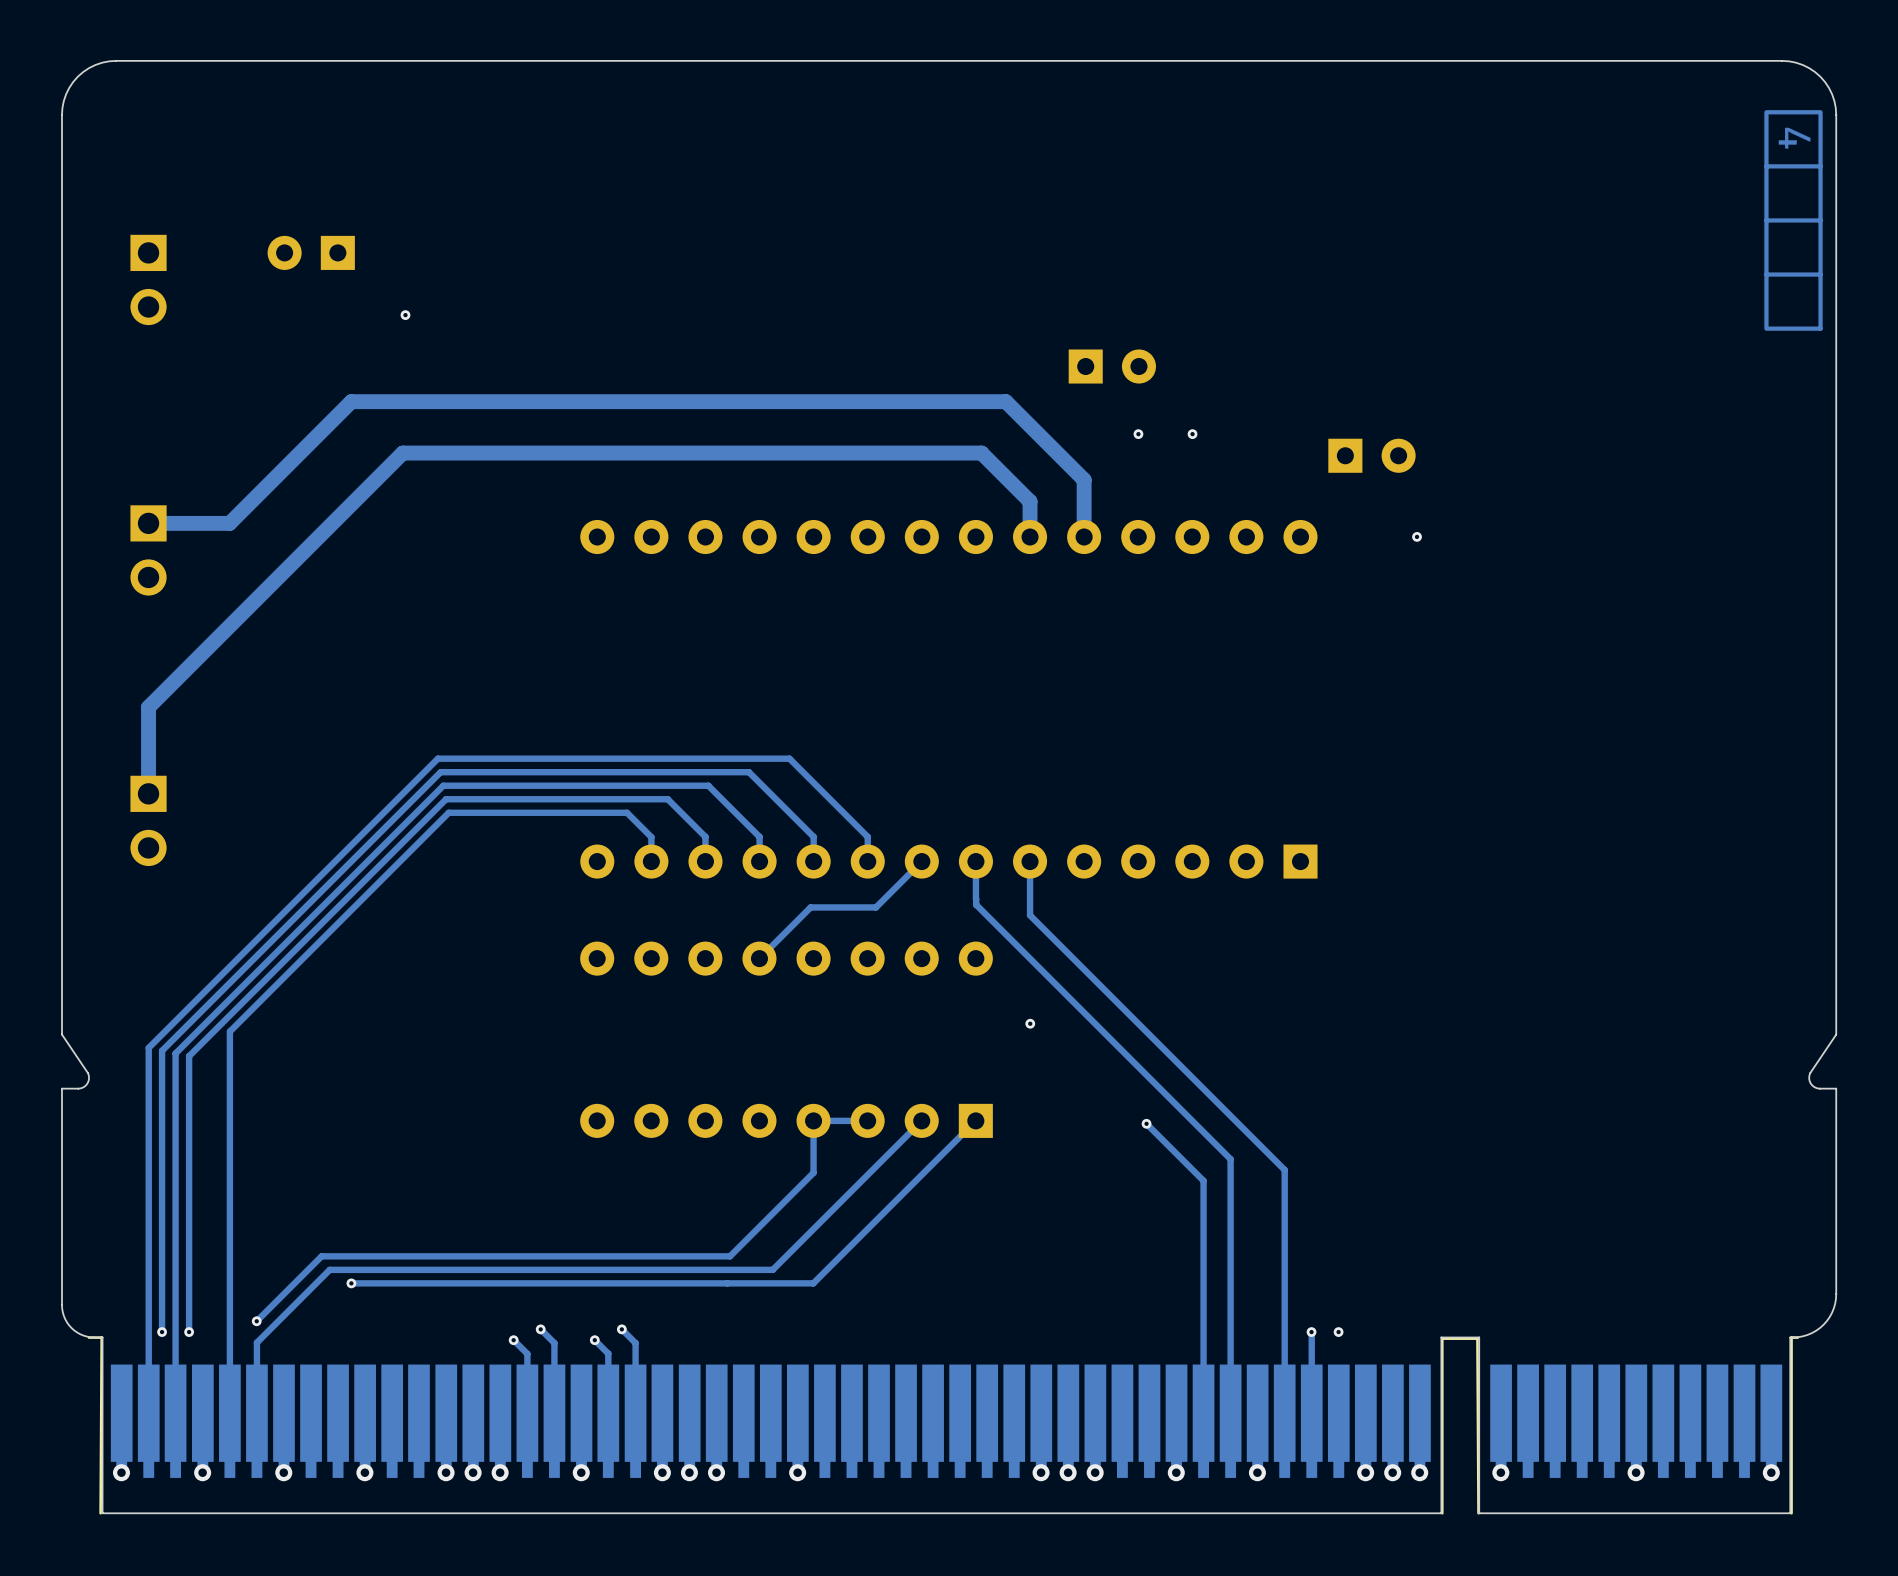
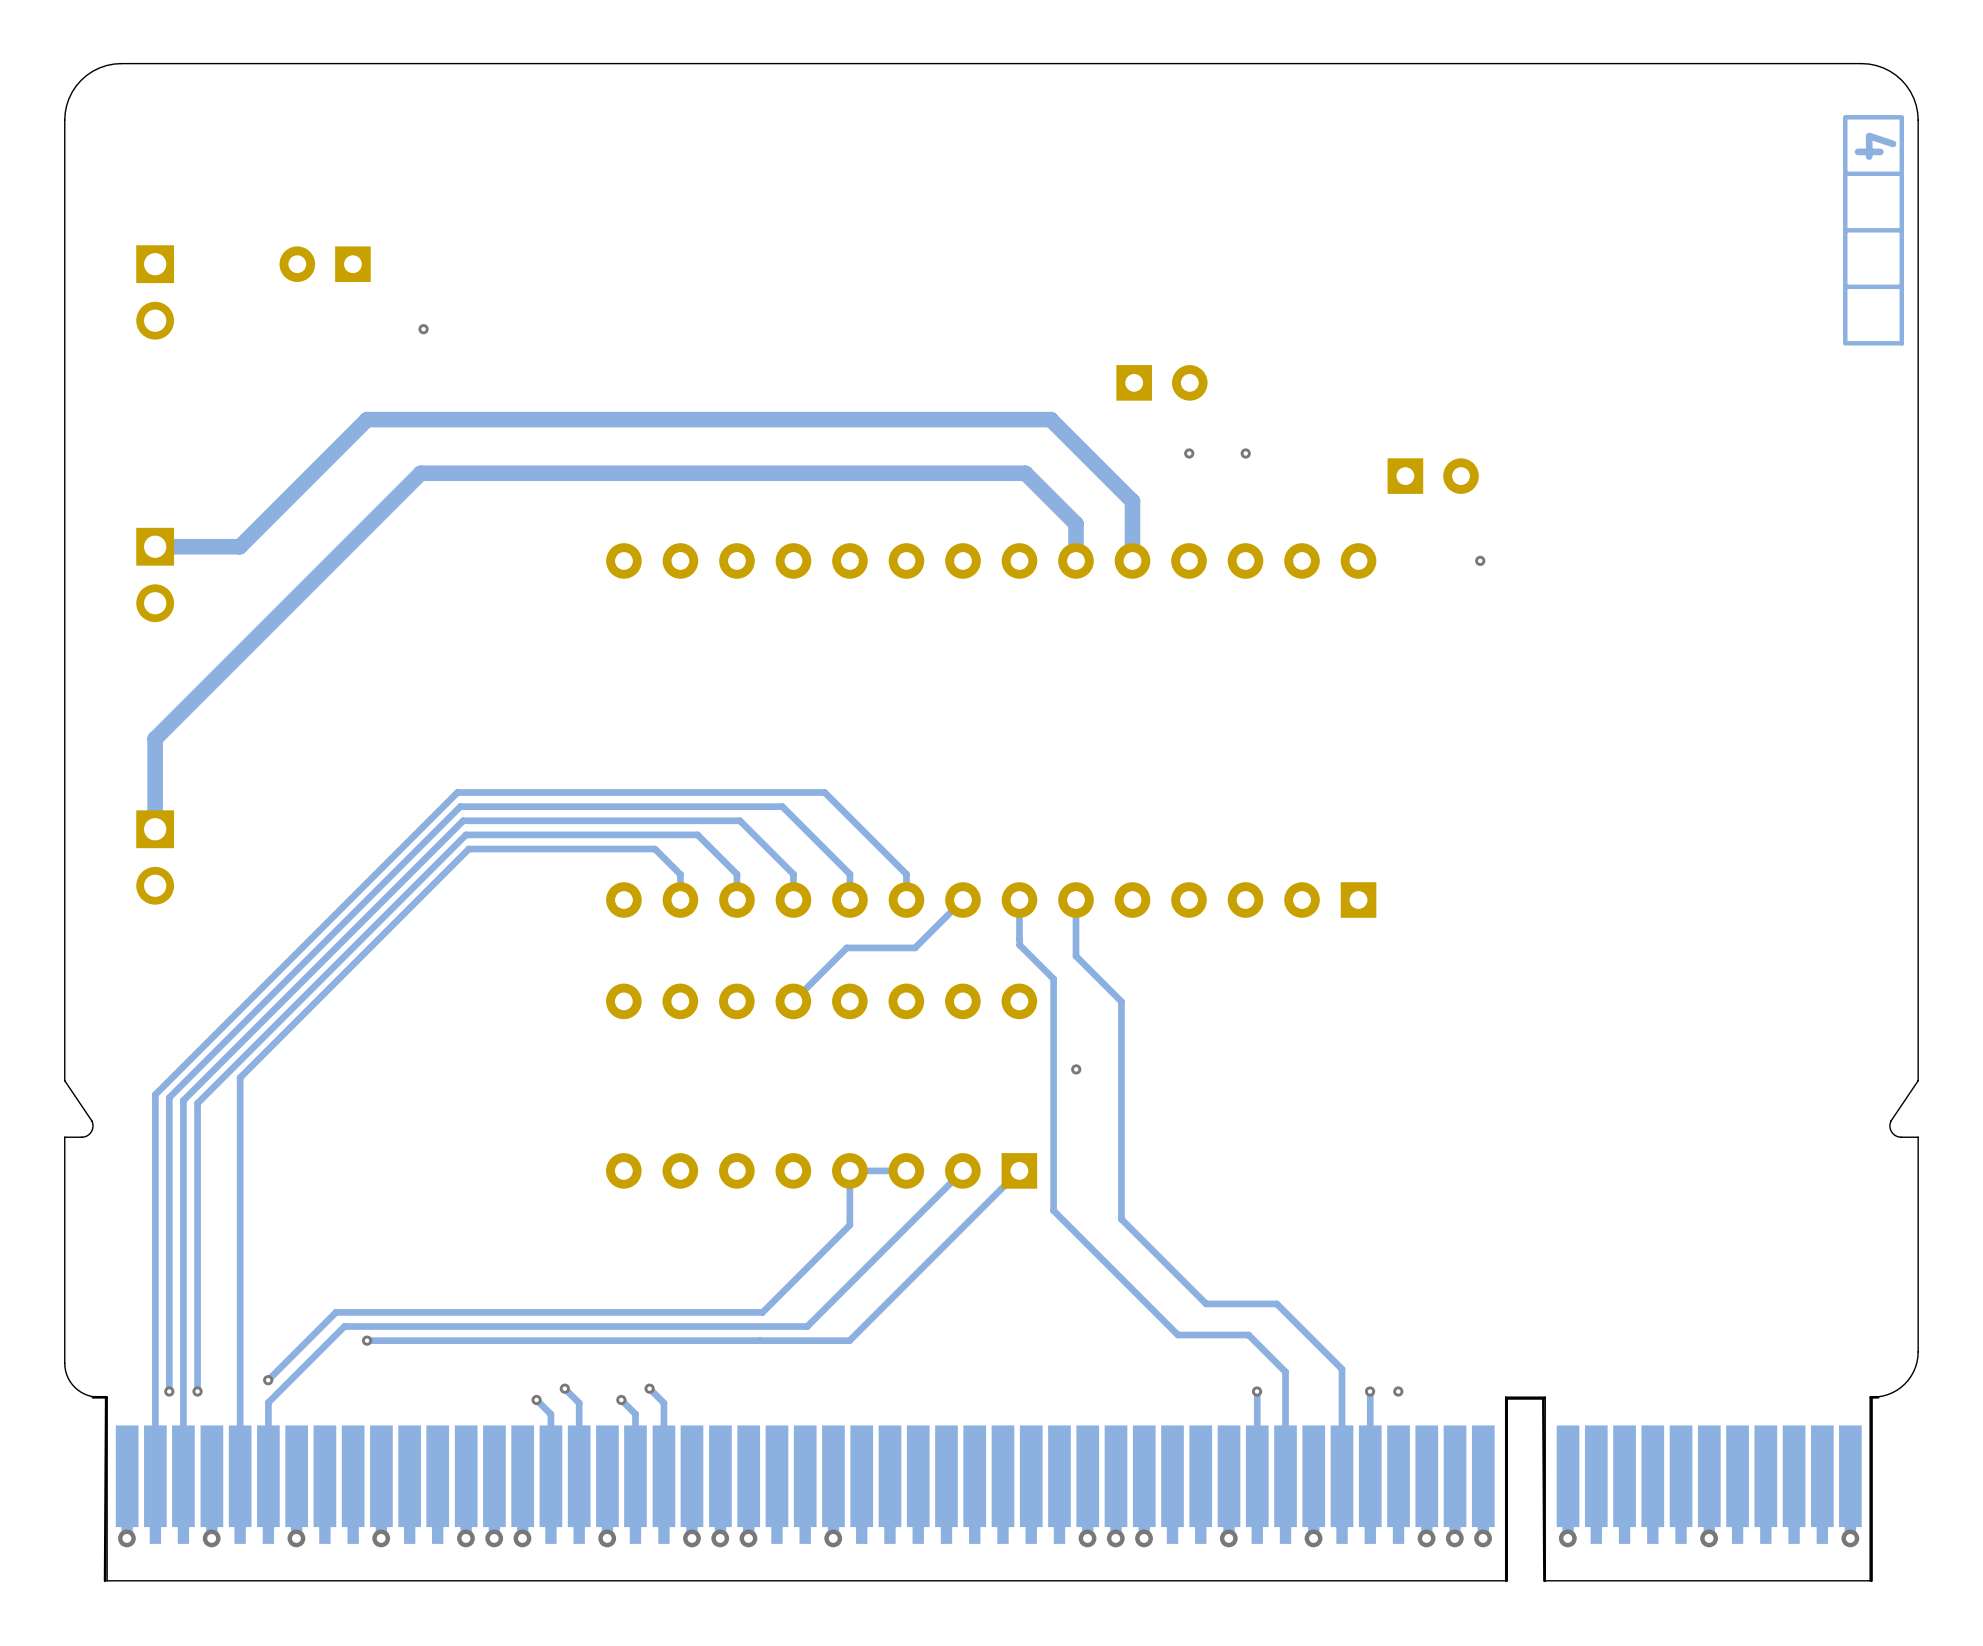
track: (1008, 937) (1230, 1159) (1230, 1313) -> (1053, 979) (1053, 1210) (1177, 1334) (1248, 1334) (1285, 1371)
track: (1073, 958) (1284, 1170) (1284, 1310) -> (1121, 1001) (1121, 1219) (1206, 1303) (1276, 1303) (1342, 1369)
track: (1146, 1123) (1203, 1180) (1203, 1332) -> none
via: (1146, 1123) -> none
via: none -> (1257, 1391)

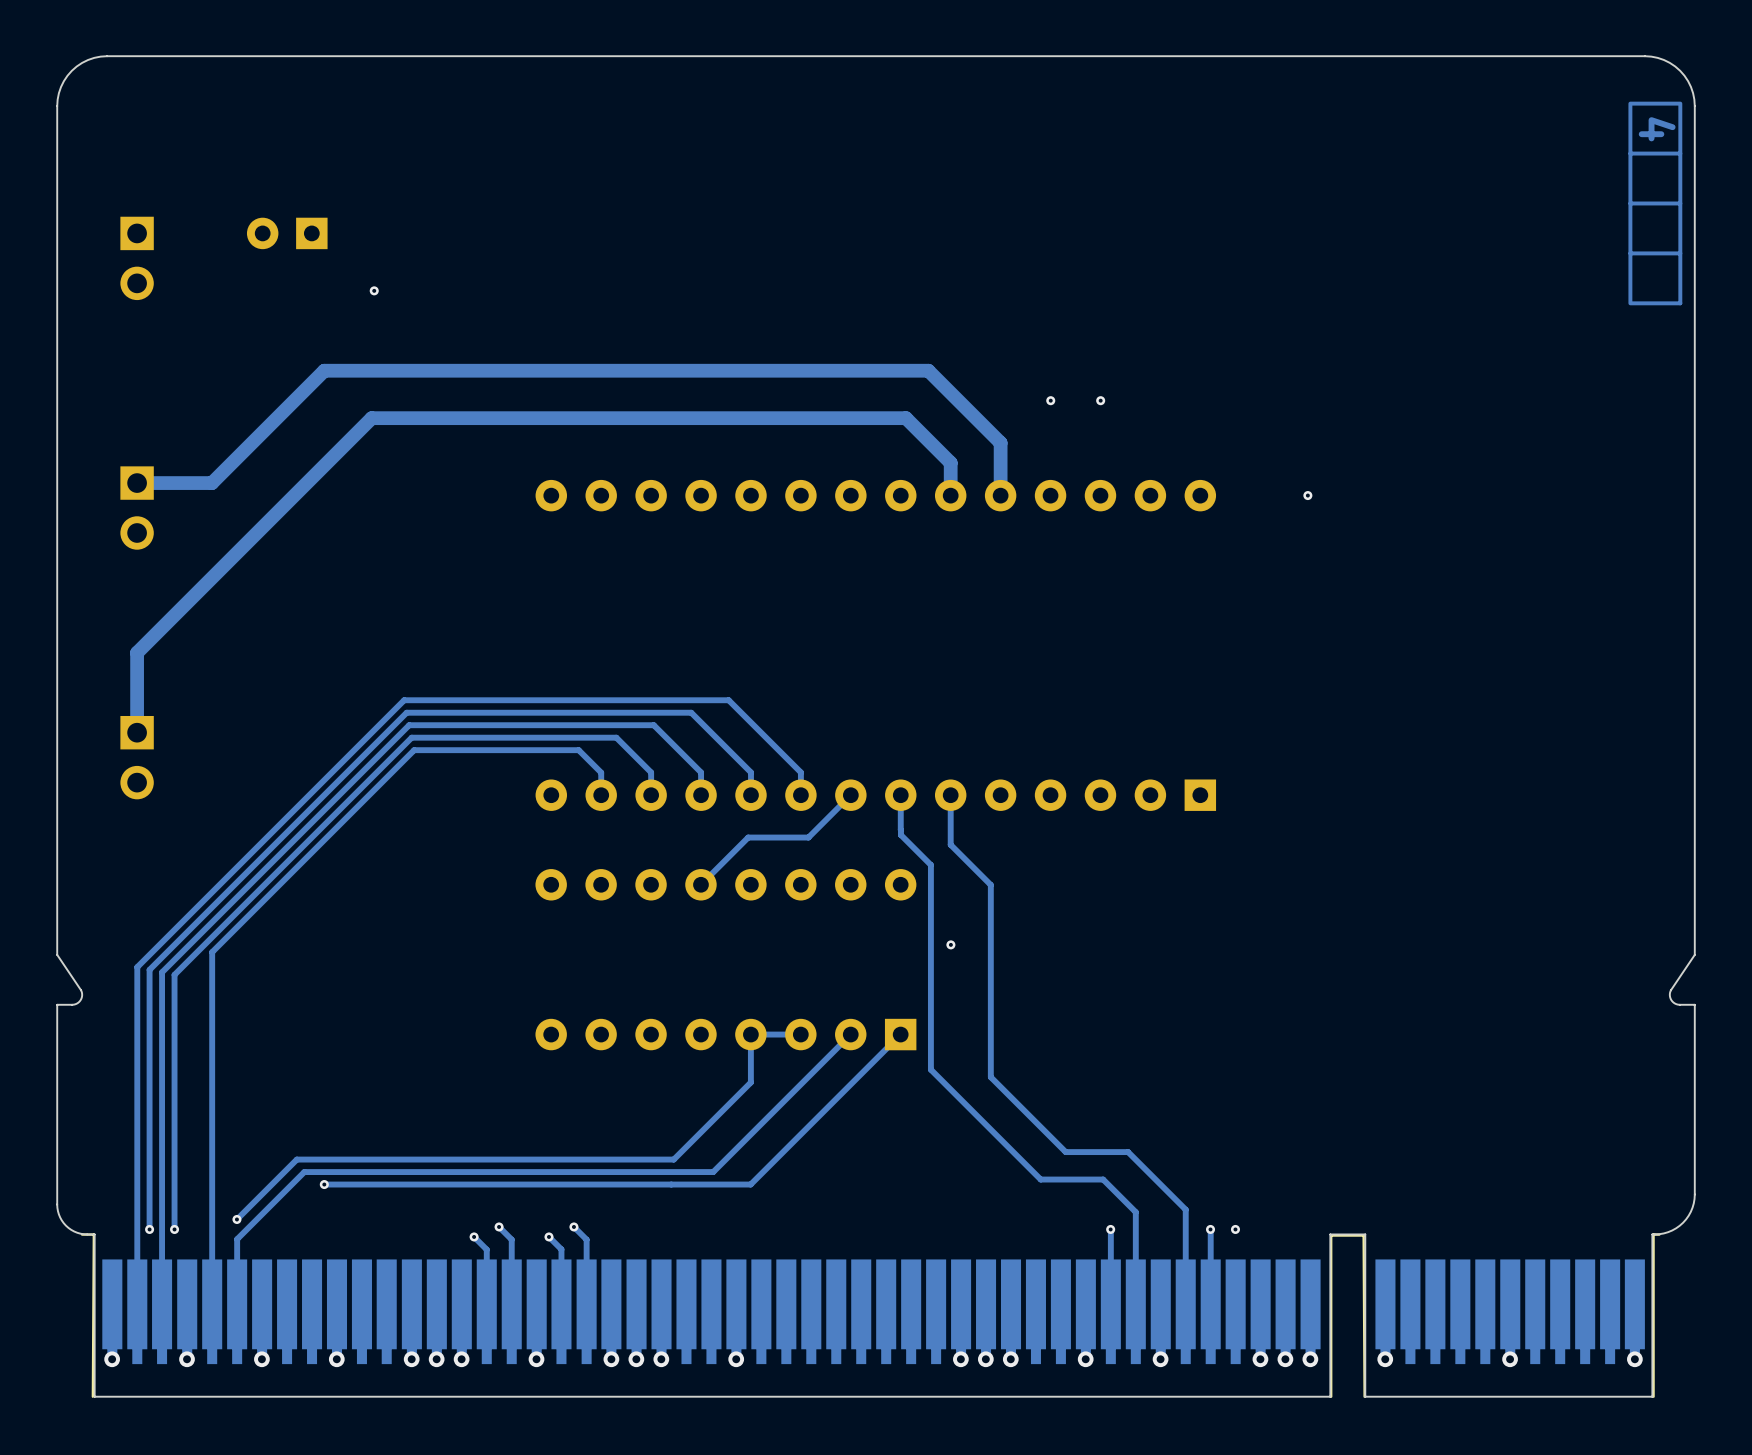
part: (1161, 382) -> none
part: (1433, 476) -> none

